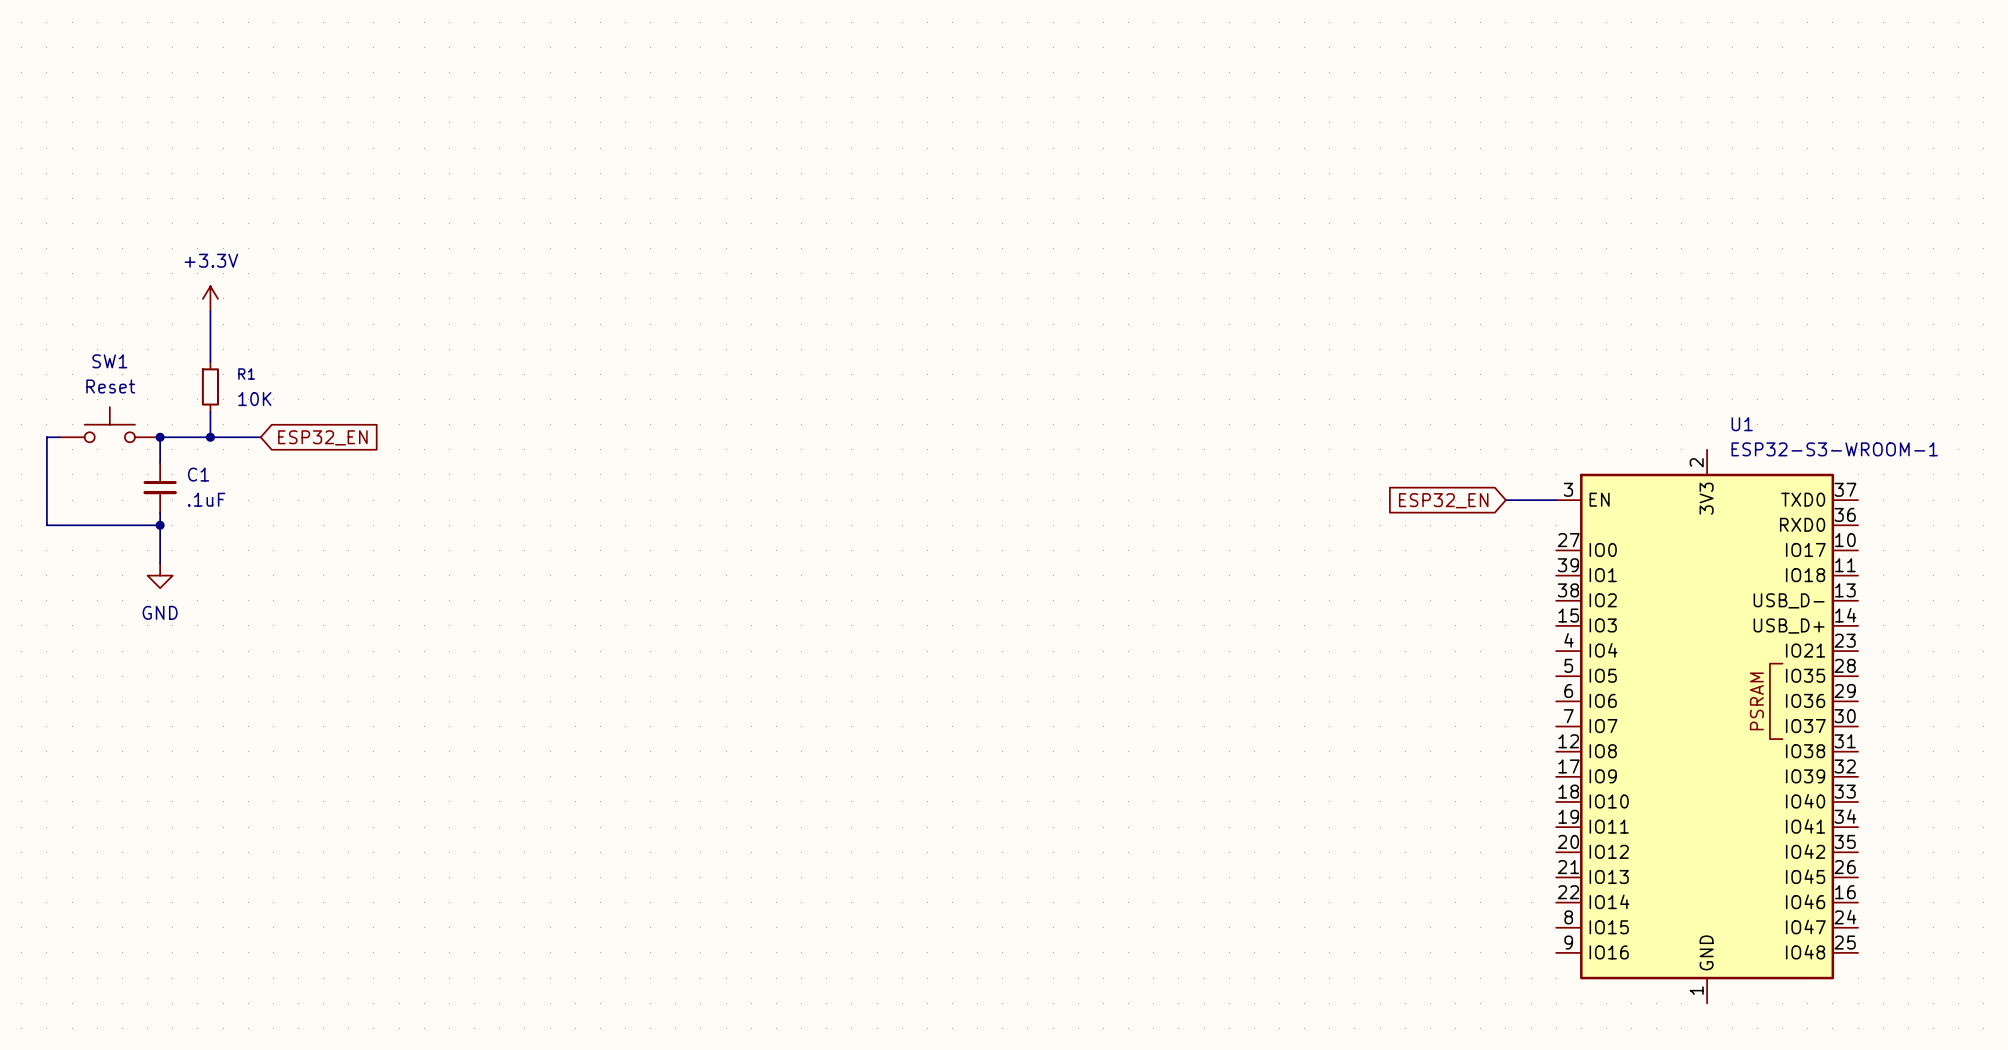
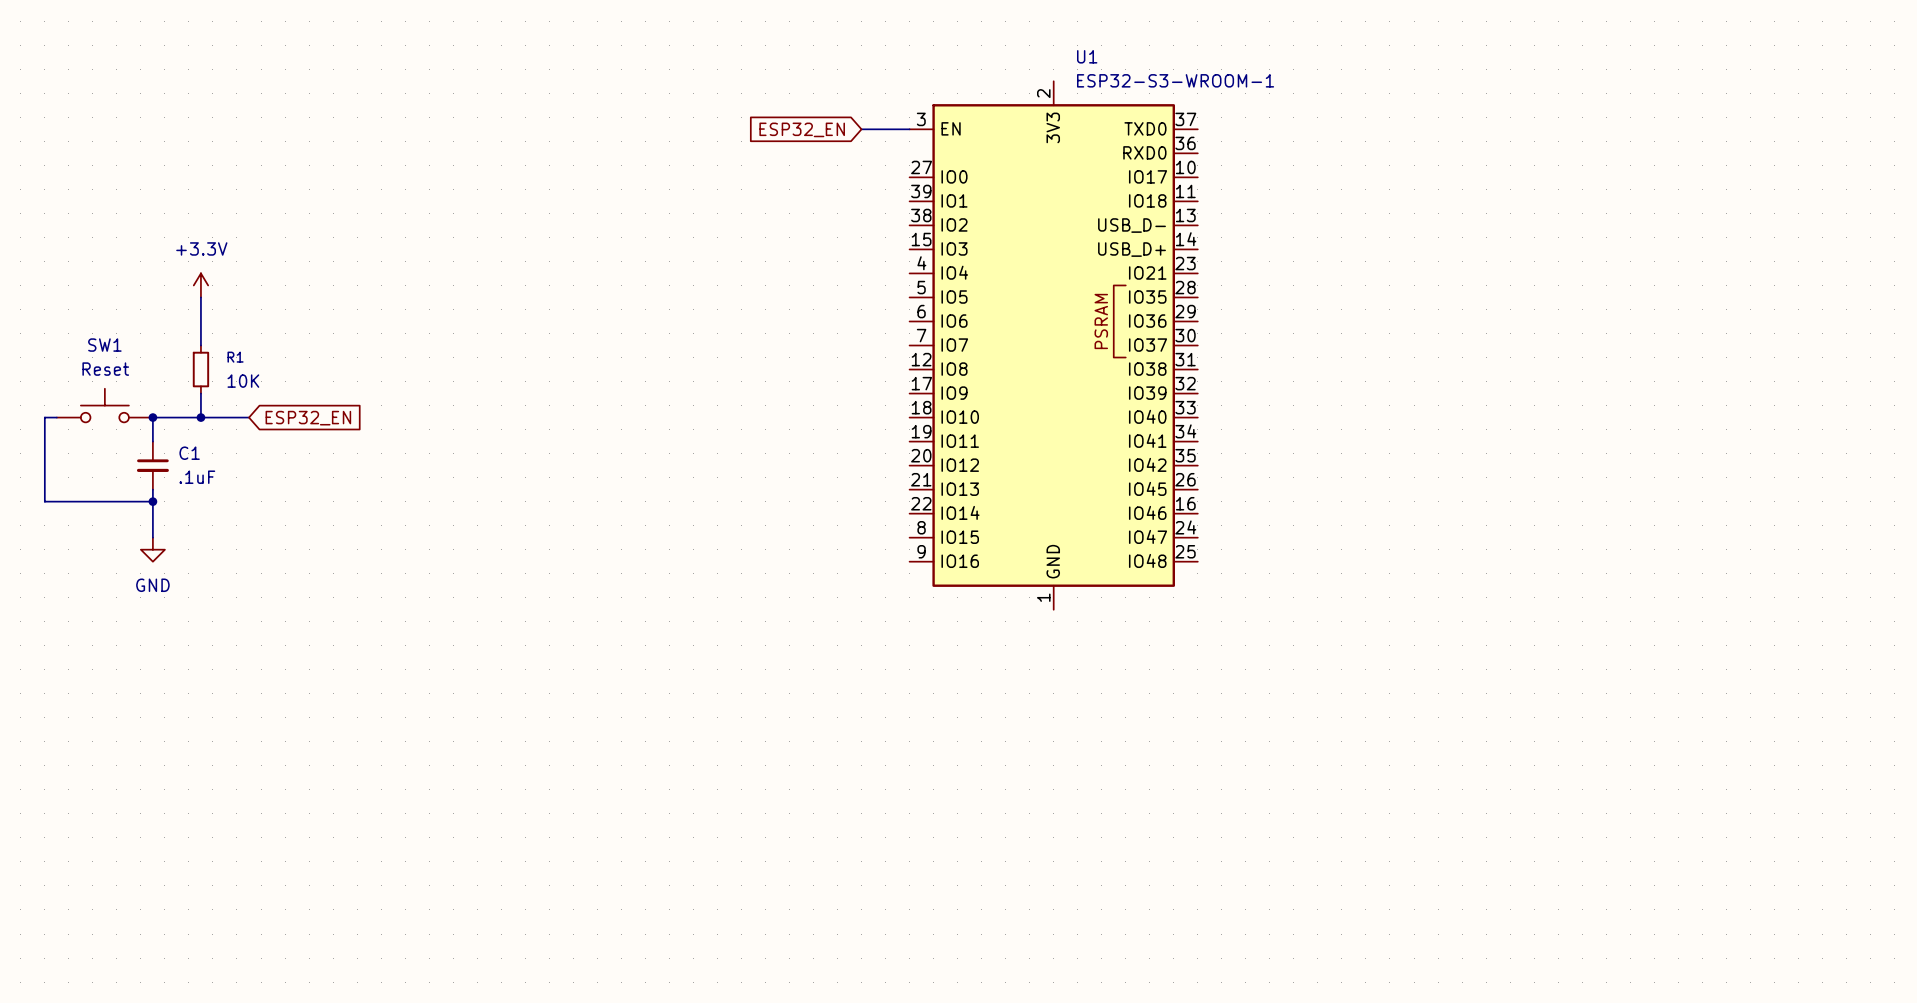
wire: none -> (861, 129) (909, 129)
global label: none -> ESP32_EN (802, 129)
global label: ESP32_EN (1443, 500) -> none
wire: (1505, 500) (1556, 500) -> none
U1 position: (1707, 726) -> (1053, 345)

